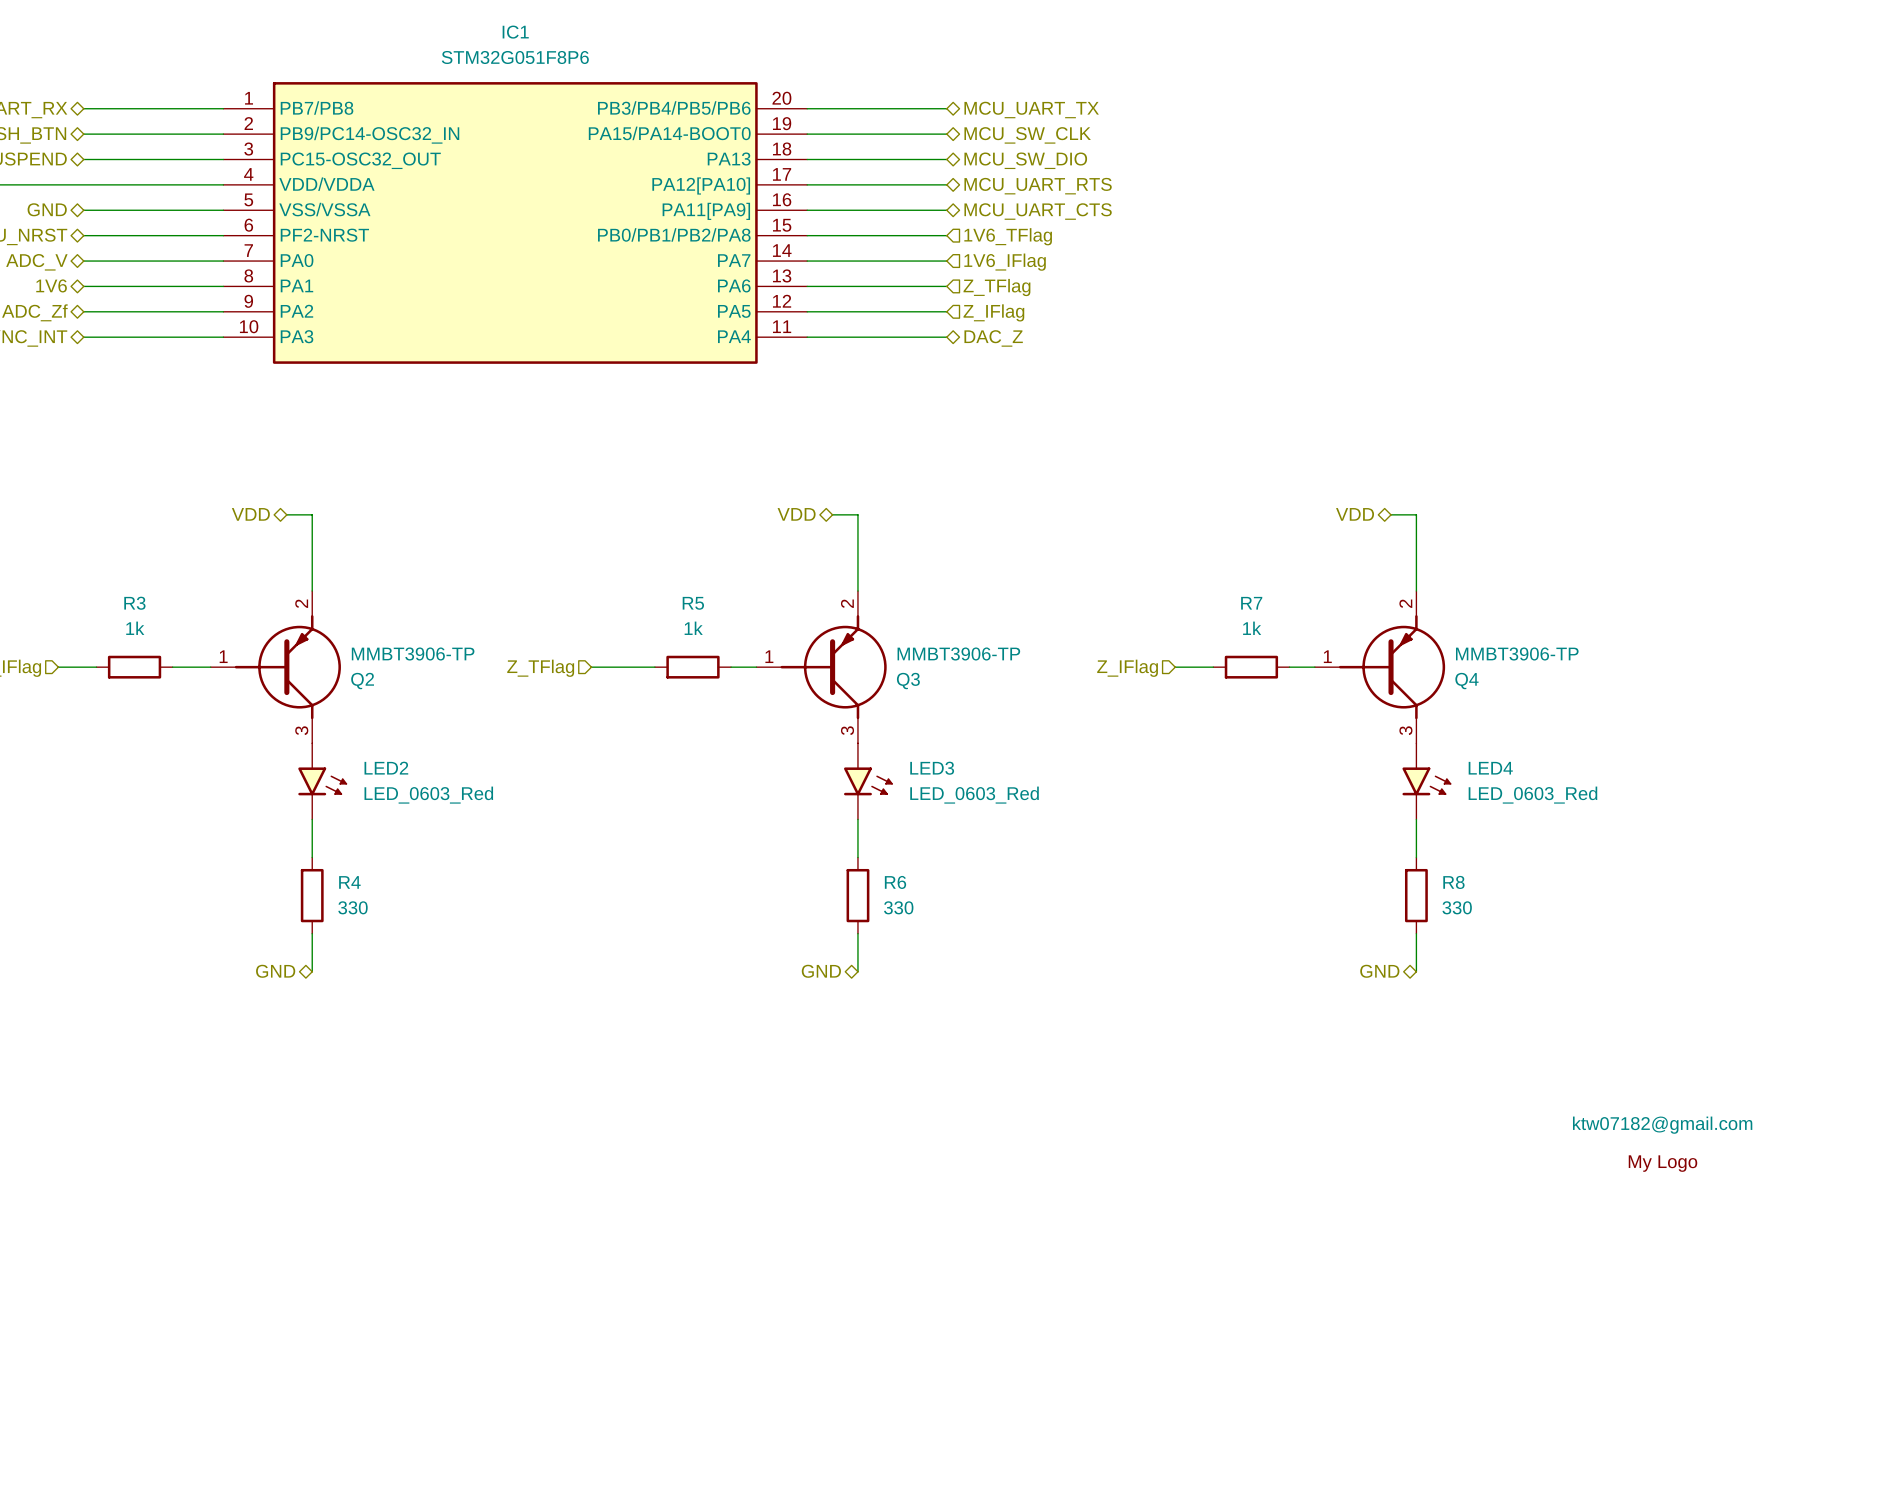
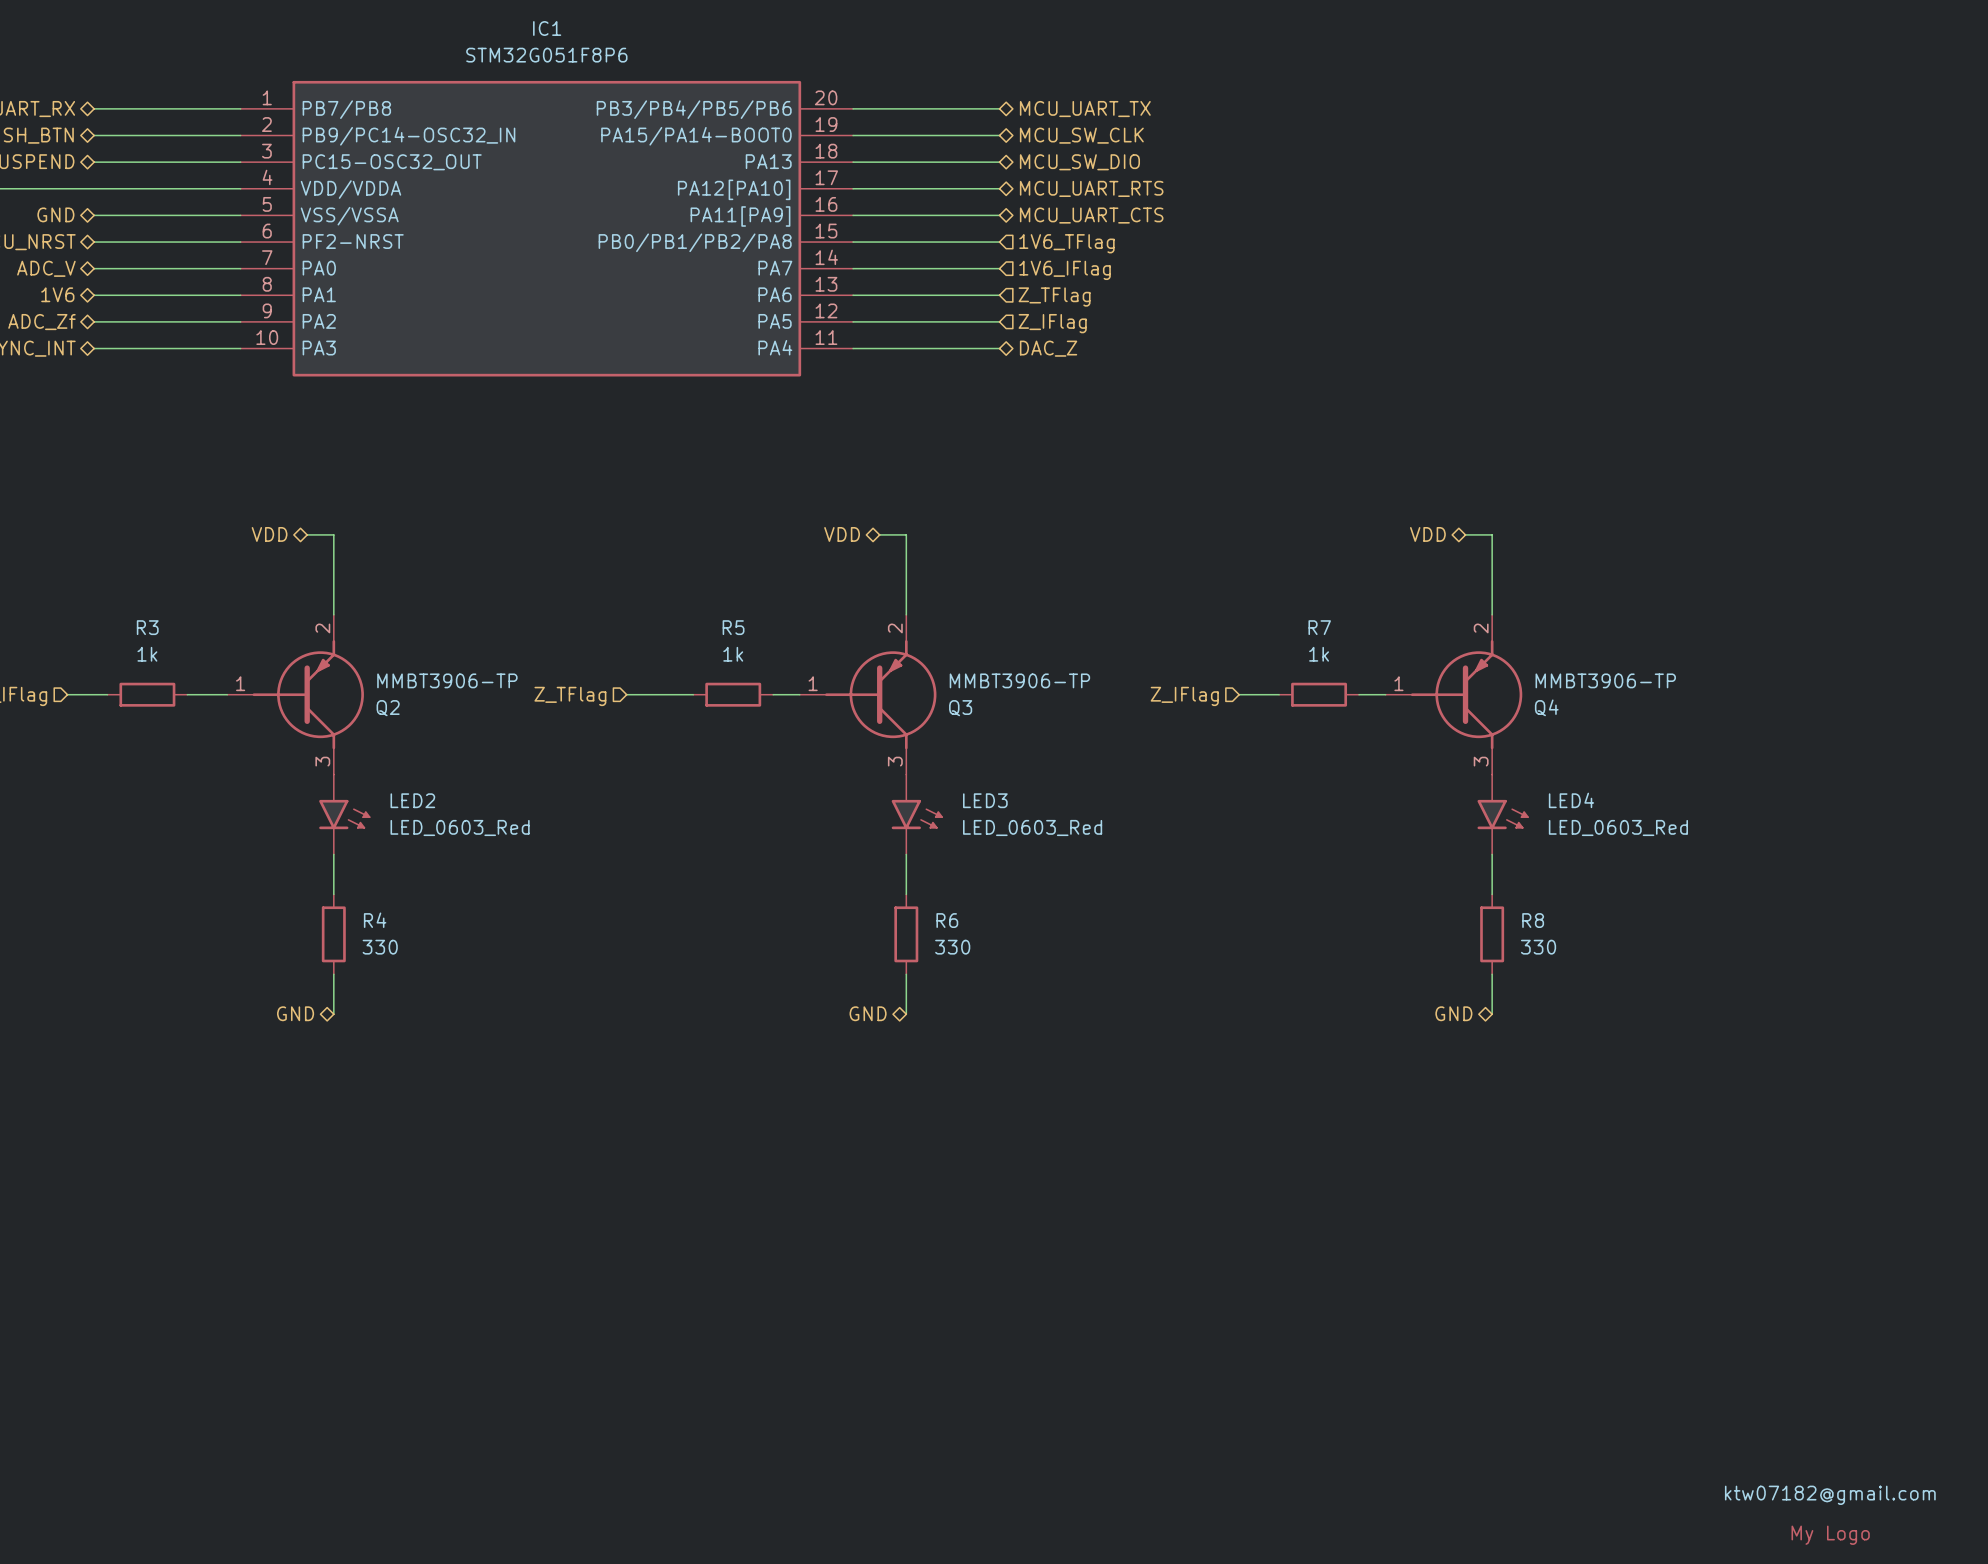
part: ktw07182@gmail.com (1662, 1144) -> none
part: none -> ktw07182@gmail.com (1830, 1515)

